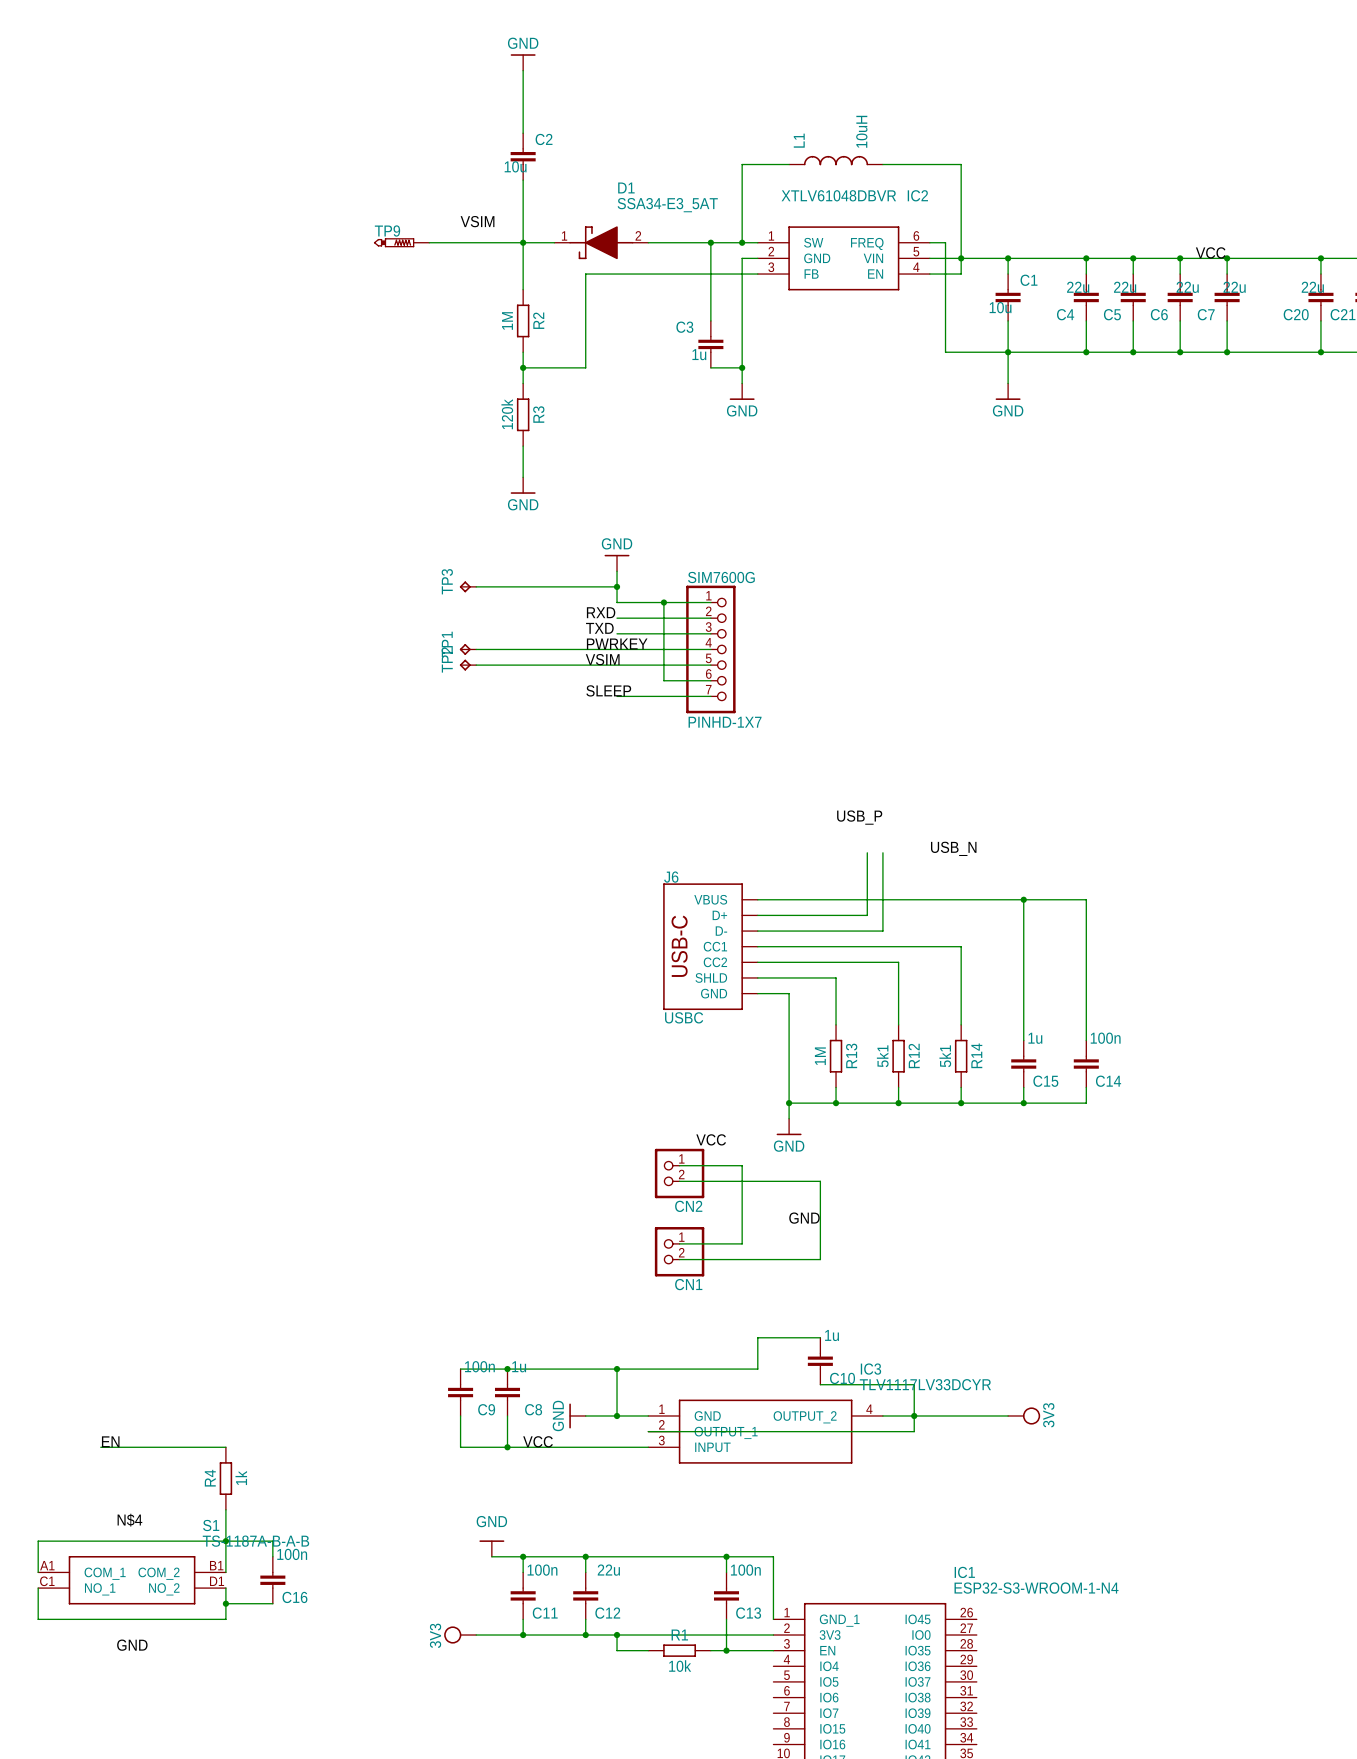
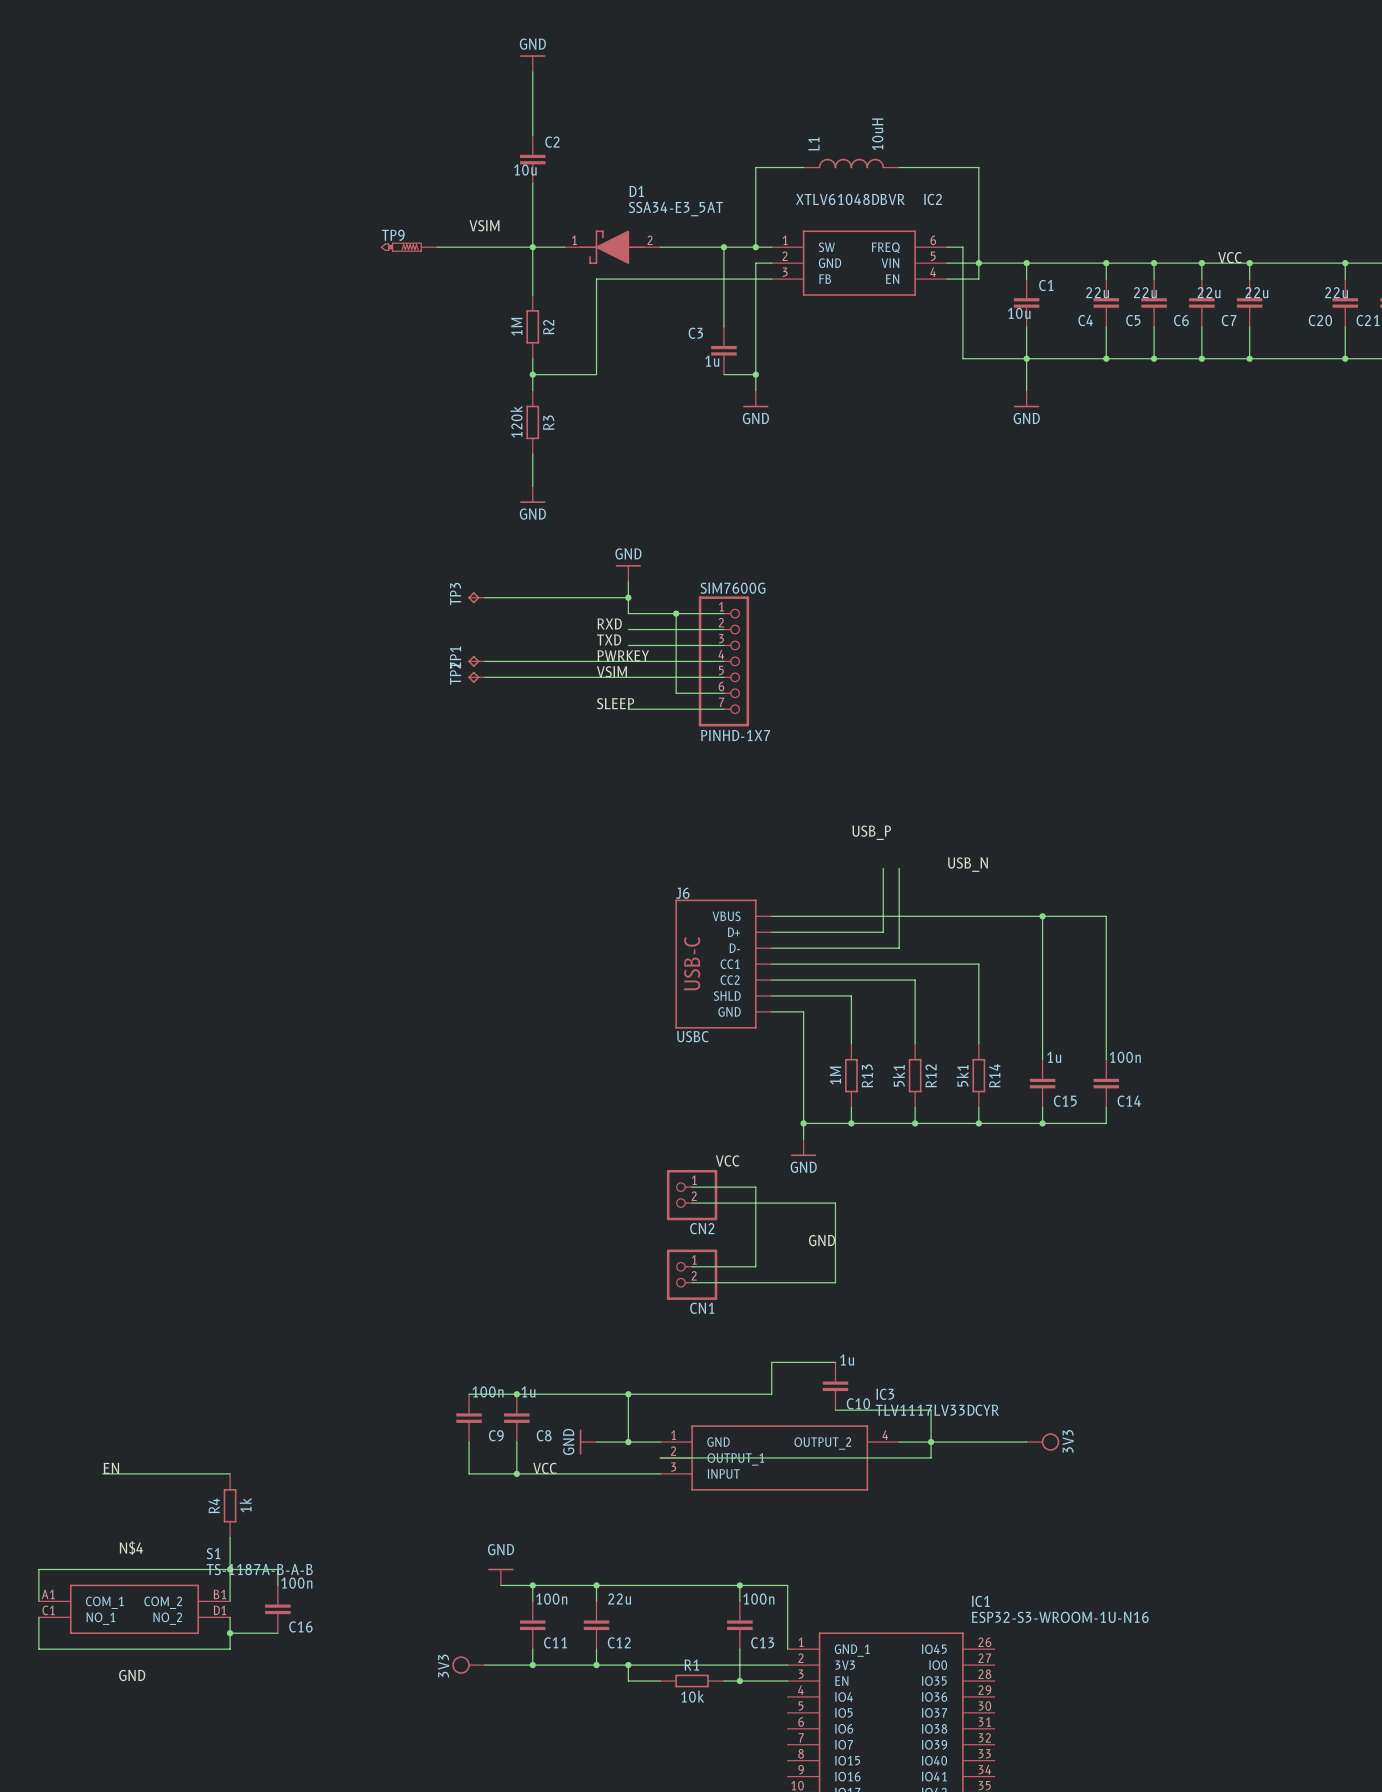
IC1 value: ESP32-S3-WROOM-1-N4 (1036, 1588) -> ESP32-S3-WROOM-1U-N16 (1060, 1617)

